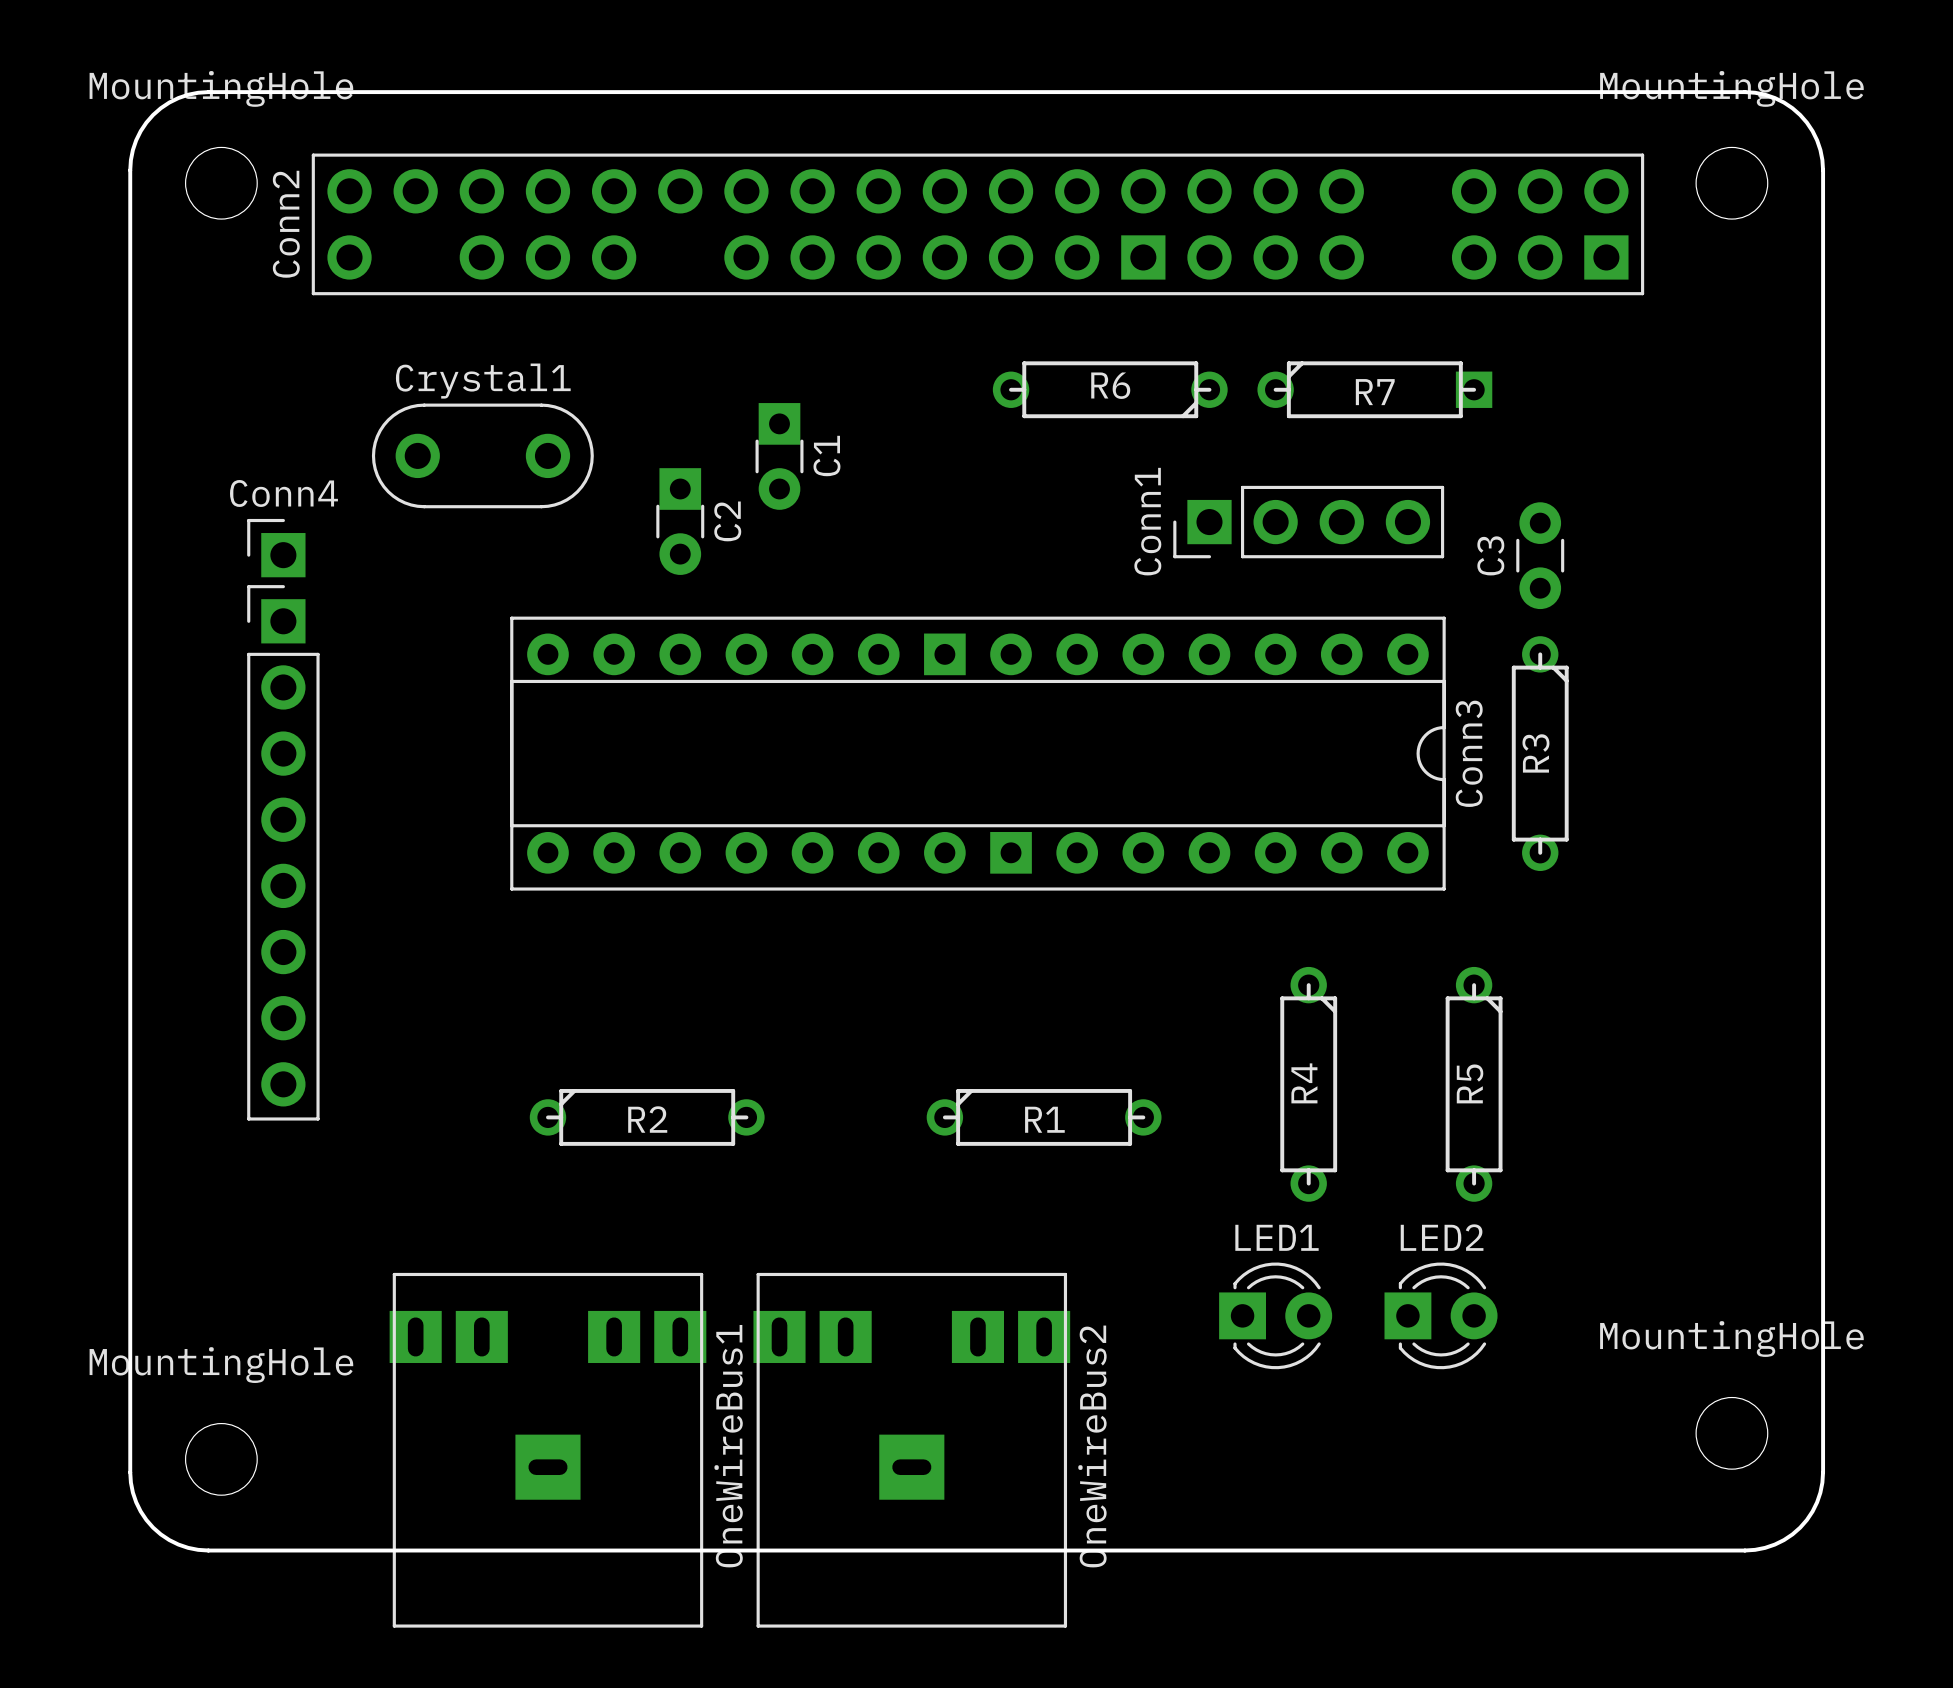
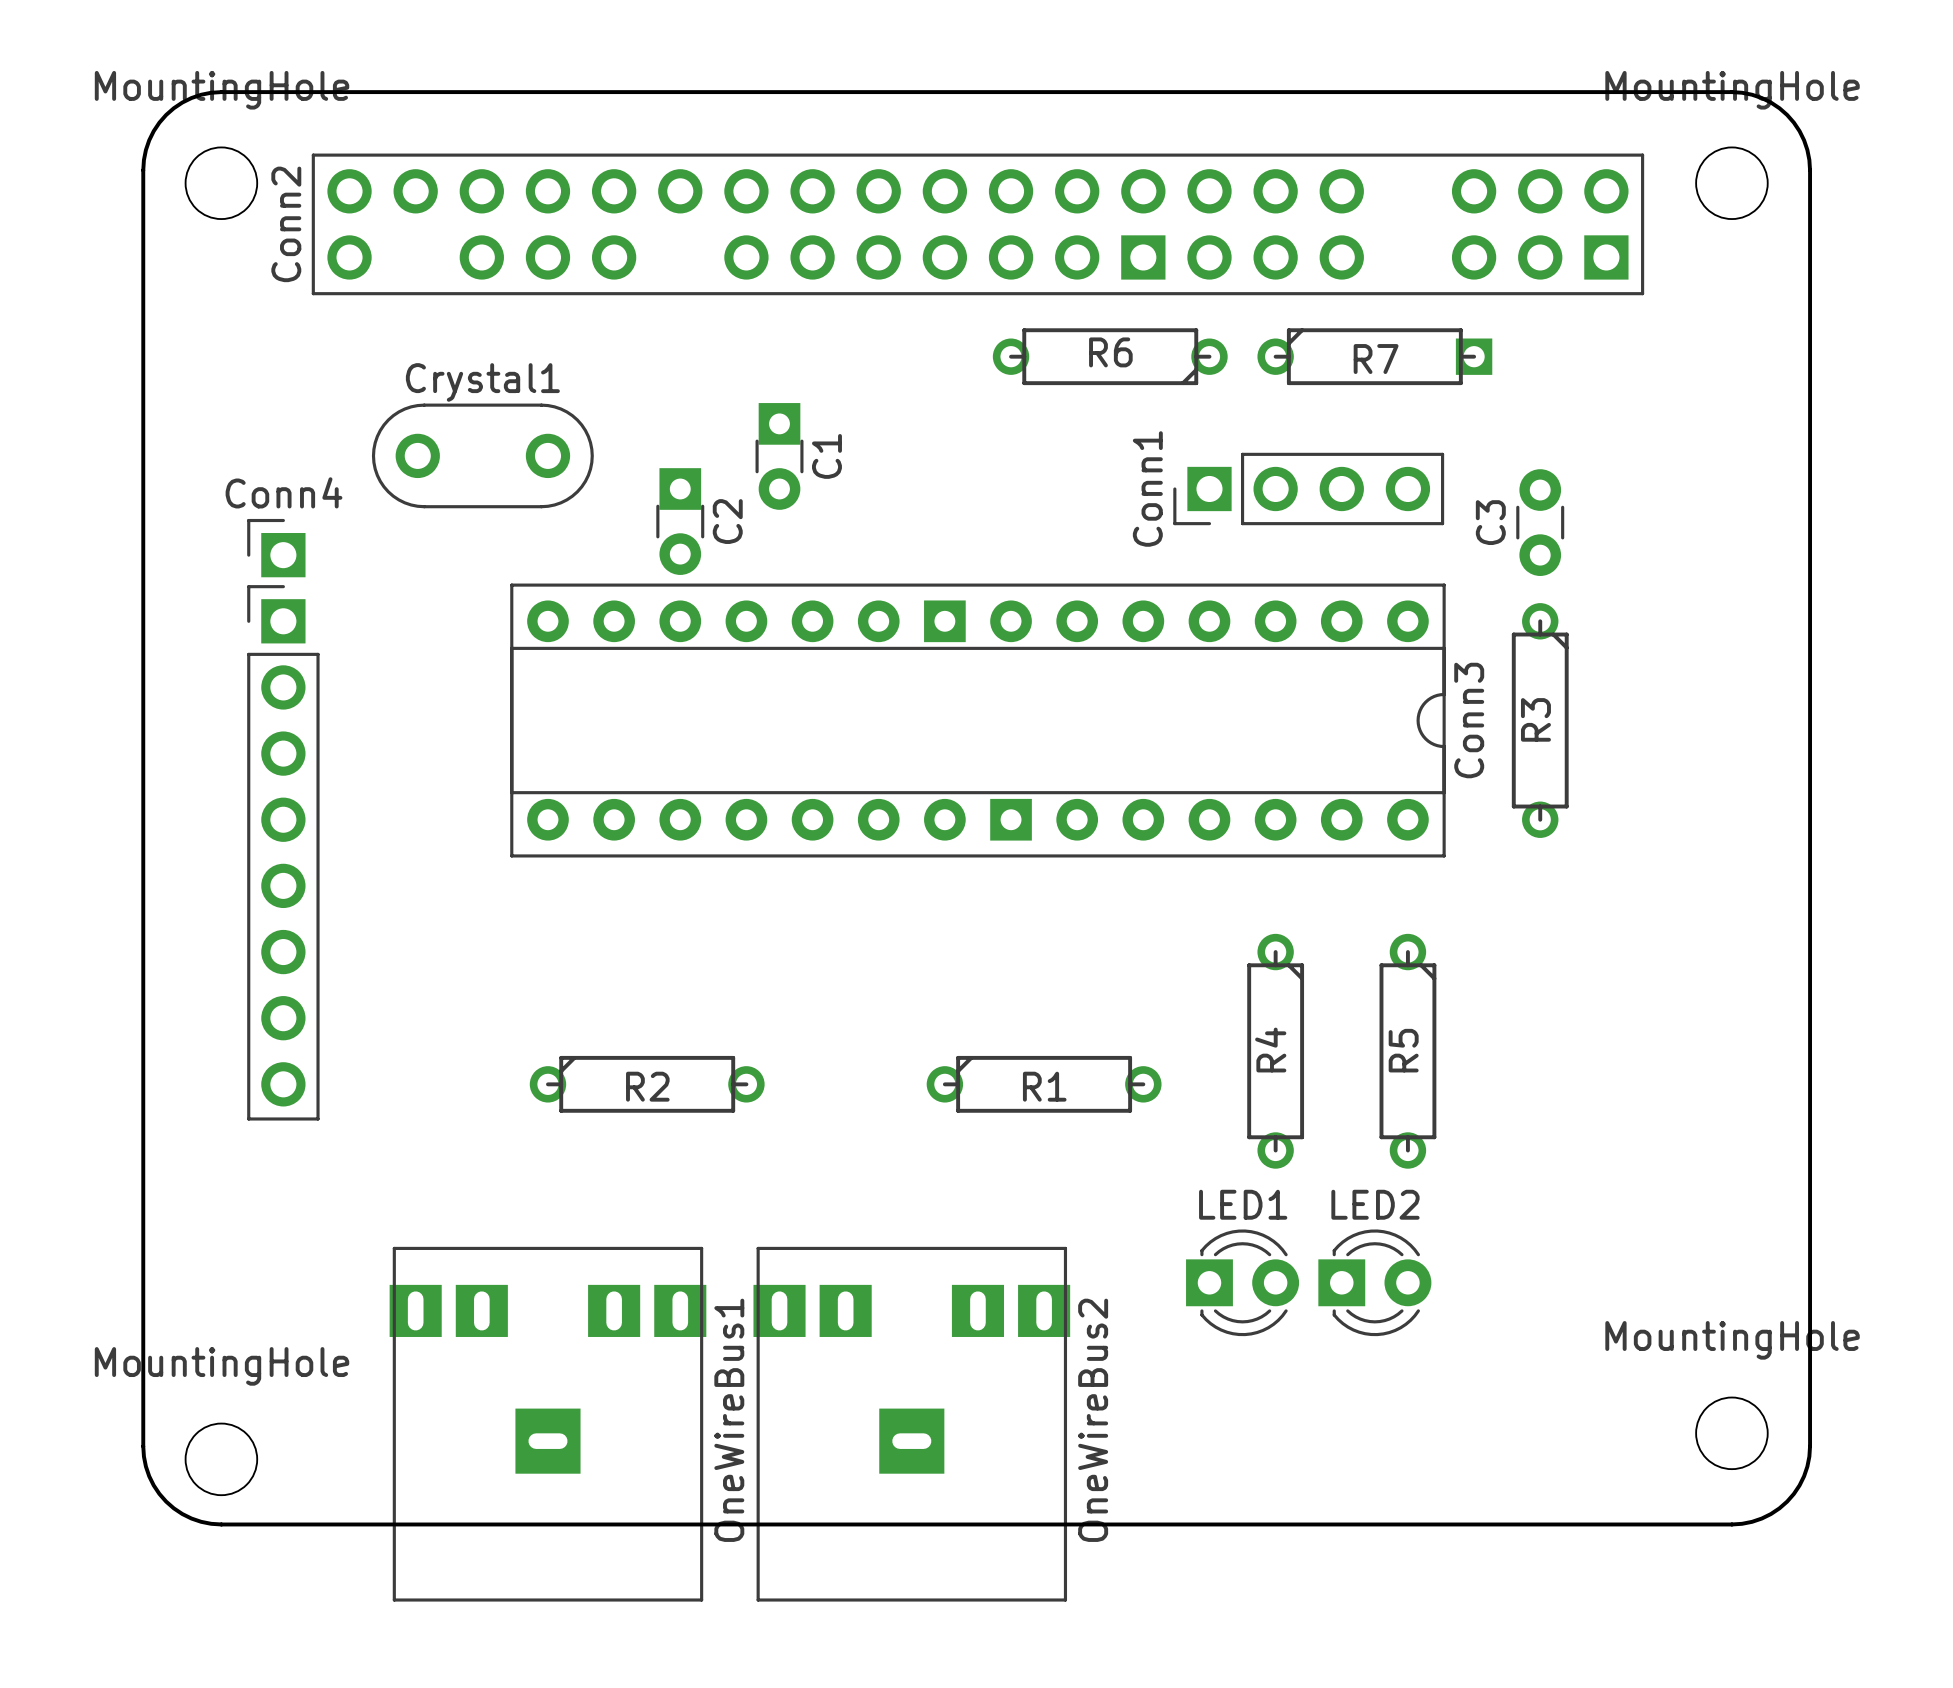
board edge: (221, 92) (188, 94) (160, 108) (146, 122) (136, 140) (130, 170) (130, 1472) (136, 1502) (153, 1527) (178, 1544) (208, 1550) (1744, 1550) (1774, 1544) (1800, 1527) (1817, 1502) (1823, 1472) (1823, 170) (1817, 140) (1806, 122) (1792, 108) (1765, 94) (1731, 92) -> (221, 92) (191, 98) (166, 114) (149, 140) (143, 170) (143, 1446) (149, 1476) (166, 1501) (191, 1518) (221, 1524) (1731, 1524) (1761, 1518) (1787, 1501) (1804, 1476) (1810, 1446) (1810, 170) (1804, 140) (1787, 114) (1761, 98) (1731, 92)
R6 position: (1110, 389) -> (1110, 356)
R7 position: (1374, 389) -> (1374, 356)
Conn1 position: (1308, 522) -> (1308, 488)
C3 position: (1540, 555) -> (1540, 522)
Conn3 position: (977, 753) -> (977, 720)
R3 position: (1540, 753) -> (1540, 720)
R4 position: (1308, 1084) -> (1275, 1051)
R5 position: (1474, 1084) -> (1407, 1051)
R2 position: (647, 1117) -> (647, 1084)
R1 position: (1044, 1117) -> (1044, 1084)
LED1 position: (1275, 1315) -> (1242, 1282)
LED2 position: (1441, 1315) -> (1374, 1282)
OneWireBus1 position: (547, 1450) -> (547, 1424)
OneWireBus2 position: (911, 1450) -> (911, 1424)

